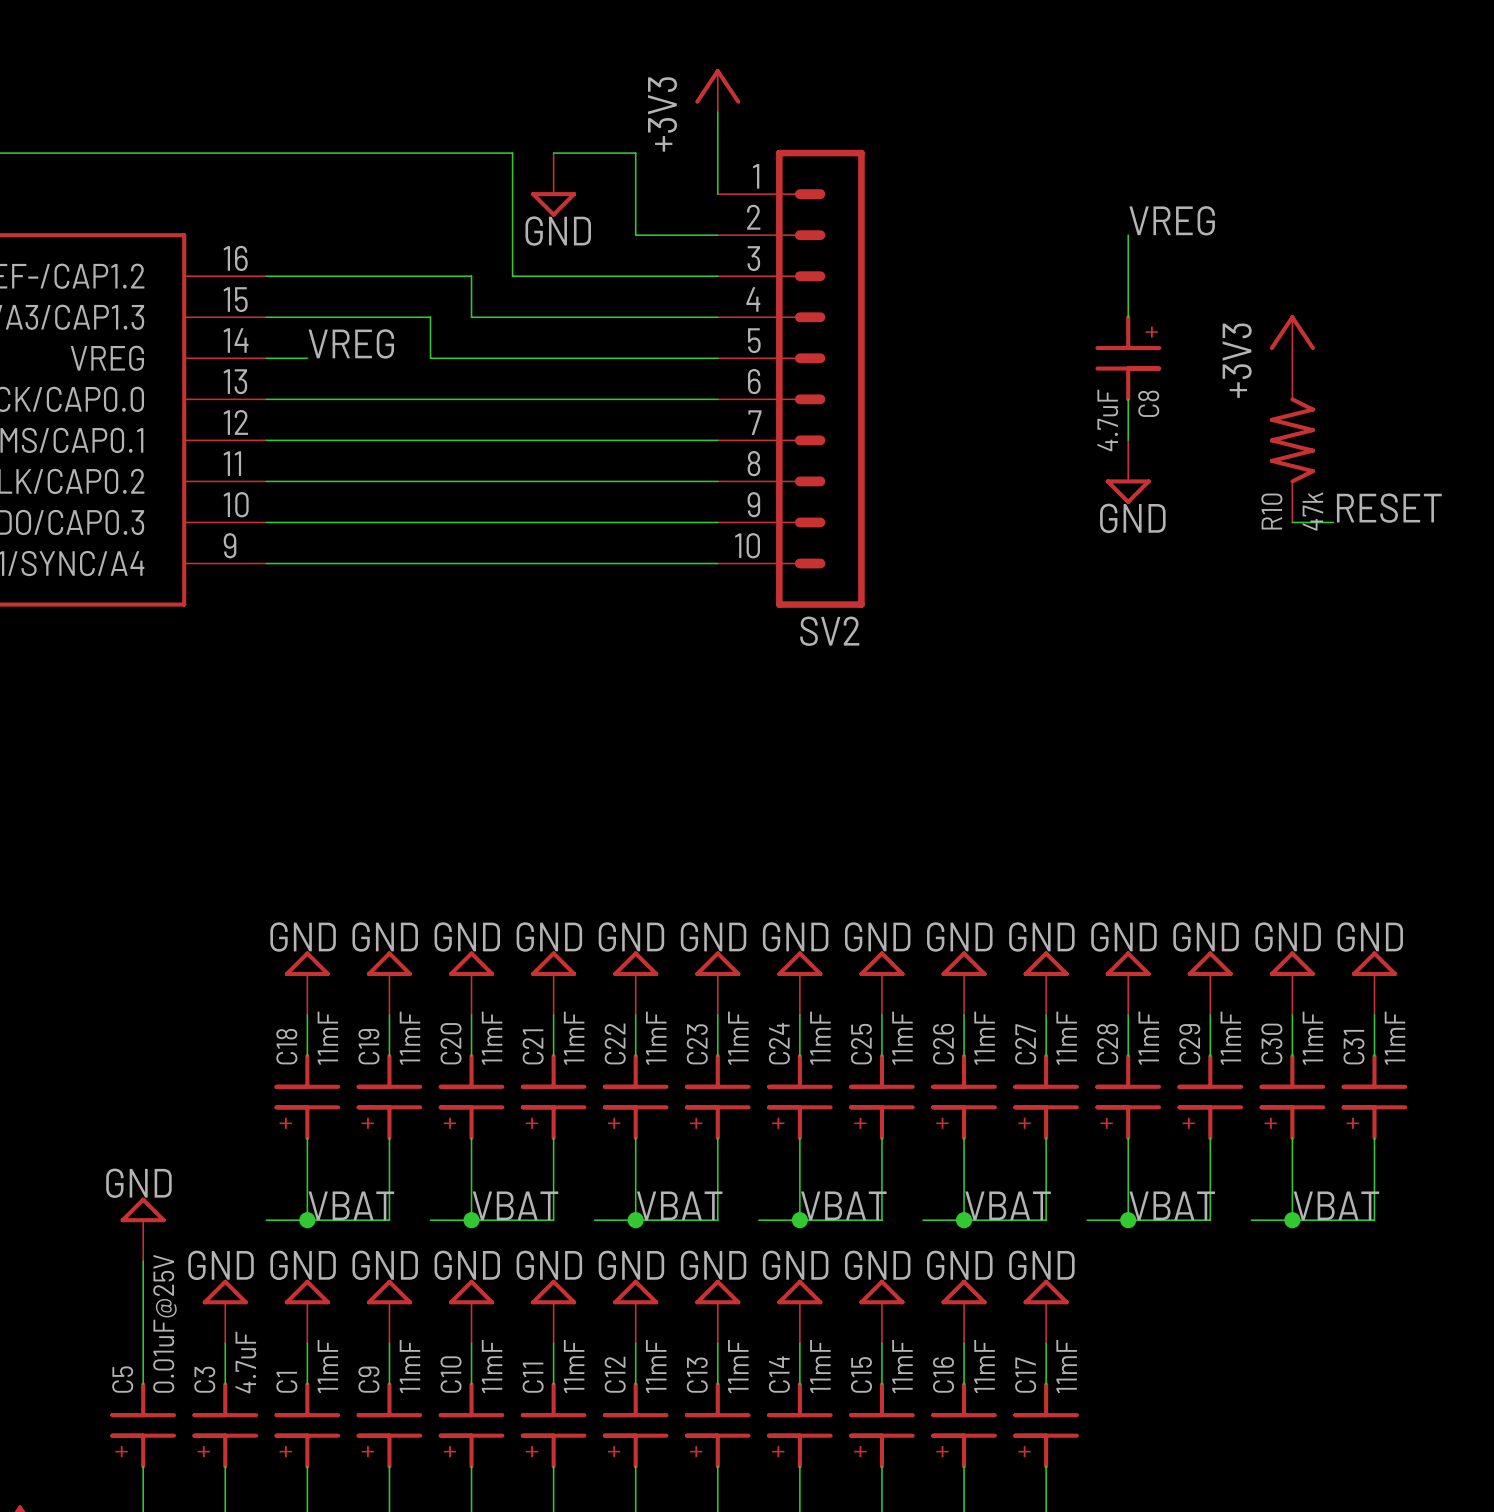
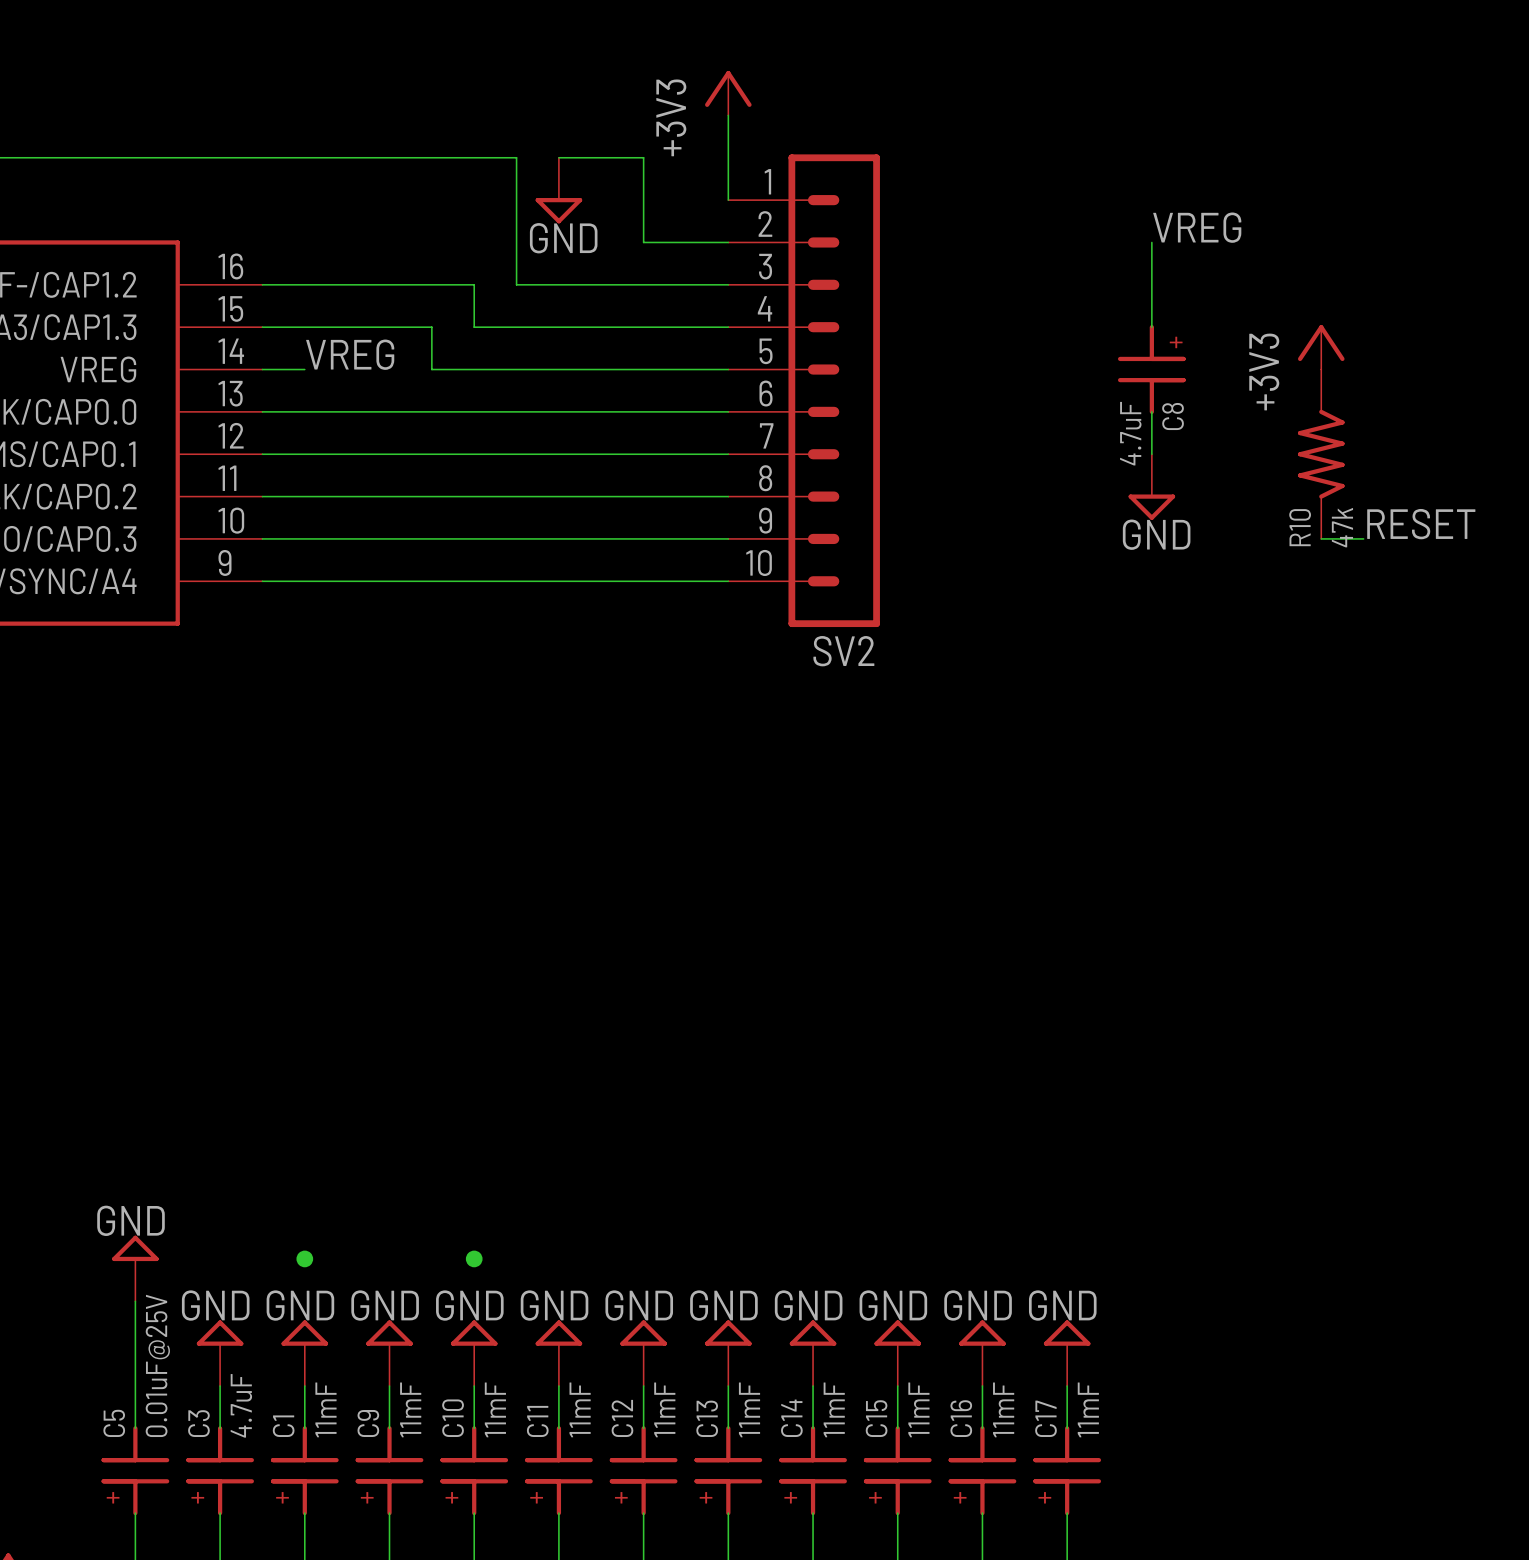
power symbol: GND (307, 983) -> none
power symbol: GND (389, 983) -> none
power symbol: GND (471, 983) -> none
power symbol: GND (553, 983) -> none
power symbol: GND (635, 983) -> none
power symbol: GND (717, 983) -> none
power symbol: GND (799, 983) -> none
power symbol: GND (881, 983) -> none
power symbol: GND (964, 983) -> none
power symbol: GND (1046, 983) -> none
power symbol: GND (1128, 983) -> none
power symbol: GND (1210, 983) -> none
power symbol: GND (1292, 983) -> none
power symbol: GND (1374, 983) -> none
wire: (307, 1014) (307, 1056) -> none
wire: (389, 1014) (389, 1056) -> none
wire: (471, 1014) (471, 1056) -> none
wire: (553, 1014) (553, 1056) -> none
wire: (635, 1014) (635, 1056) -> none
wire: (717, 1014) (717, 1056) -> none
wire: (799, 1014) (799, 1056) -> none
wire: (881, 1014) (881, 1056) -> none
wire: (964, 1014) (964, 1056) -> none
wire: (1046, 1014) (1046, 1056) -> none
wire: (1128, 1014) (1128, 1056) -> none
wire: (1210, 1014) (1210, 1056) -> none
wire: (1292, 1014) (1292, 1056) -> none
wire: (1374, 1014) (1374, 1056) -> none
C18: 11mF (307, 1097) -> none
C19: 11mF (389, 1097) -> none
C20: 11mF (471, 1097) -> none
C21: 11mF (553, 1097) -> none
C22: 11mF (635, 1097) -> none
C23: 11mF (717, 1097) -> none
C24: 11mF (799, 1097) -> none
C25: 11mF (881, 1097) -> none
C26: 11mF (964, 1097) -> none
C27: 11mF (1046, 1097) -> none
C28: 11mF (1128, 1097) -> none
C29: 11mF (1210, 1097) -> none
C30: 11mF (1292, 1097) -> none
C31: 11mF (1374, 1097) -> none
wire: (307, 1138) (307, 1220) -> none
wire: (389, 1138) (389, 1220) (266, 1220) -> none
wire: (471, 1138) (471, 1220) -> none
wire: (553, 1138) (553, 1220) (430, 1220) -> none
wire: (635, 1138) (635, 1220) -> none
wire: (717, 1138) (717, 1220) (594, 1220) -> none
wire: (799, 1138) (799, 1220) -> none
wire: (881, 1138) (881, 1220) (758, 1220) -> none
wire: (964, 1138) (964, 1220) -> none
wire: (1046, 1138) (1046, 1220) (923, 1220) -> none
wire: (1128, 1138) (1128, 1220) -> none
wire: (1210, 1138) (1210, 1220) (1087, 1220) -> none
wire: (1292, 1138) (1292, 1220) -> none
wire: (1374, 1138) (1374, 1220) (1251, 1220) -> none
label: VBAT (351, 1205) -> none
label: VBAT (515, 1205) -> none
label: VBAT (679, 1205) -> none
label: VBAT (843, 1205) -> none
label: VBAT (1008, 1205) -> none
label: VBAT (1172, 1205) -> none
label: VBAT (1336, 1205) -> none
junction: (635, 1220) -> none
junction: (799, 1220) -> none
junction: (964, 1220) -> none
junction: (1128, 1220) -> none
junction: (1292, 1220) -> none

